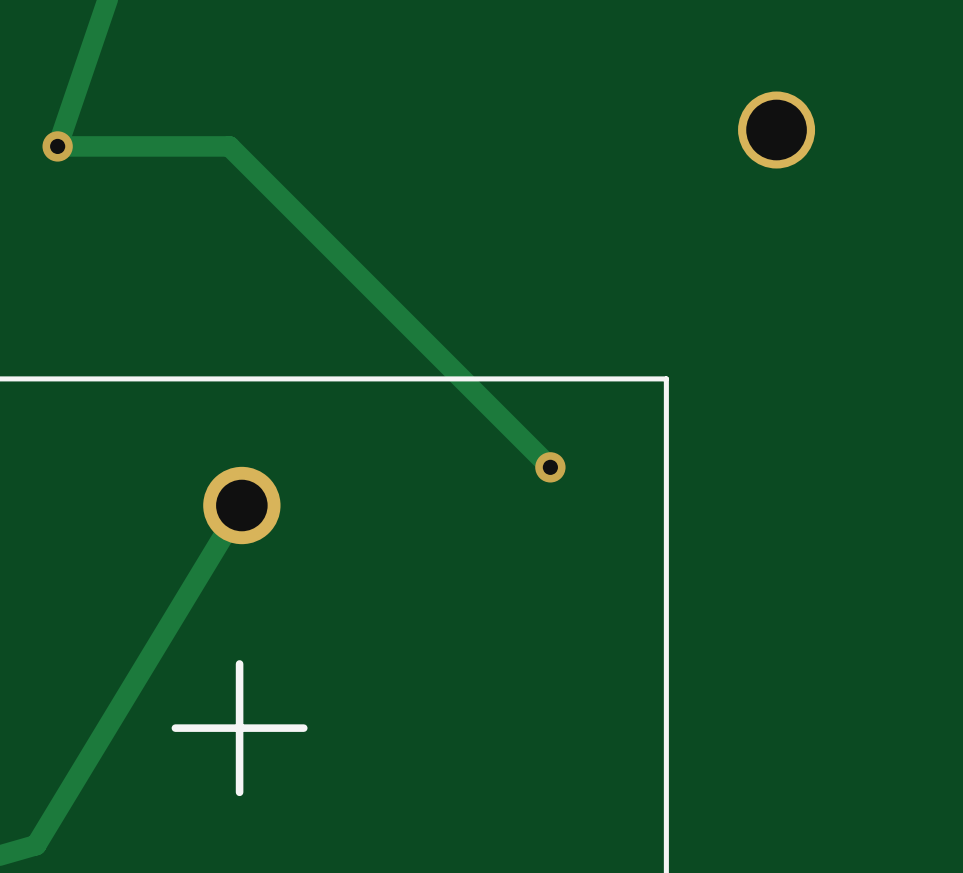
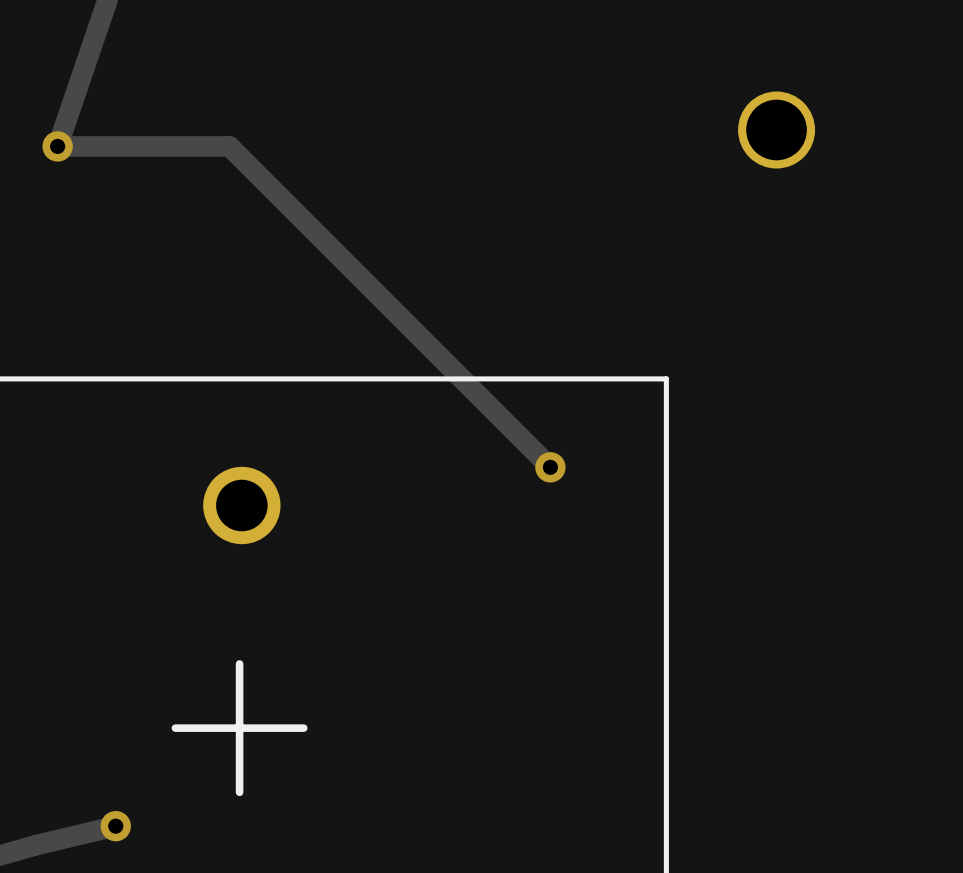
track: (241, 505) (36, 845) -> (115, 826) (36, 845)
via: none -> (115, 826)

